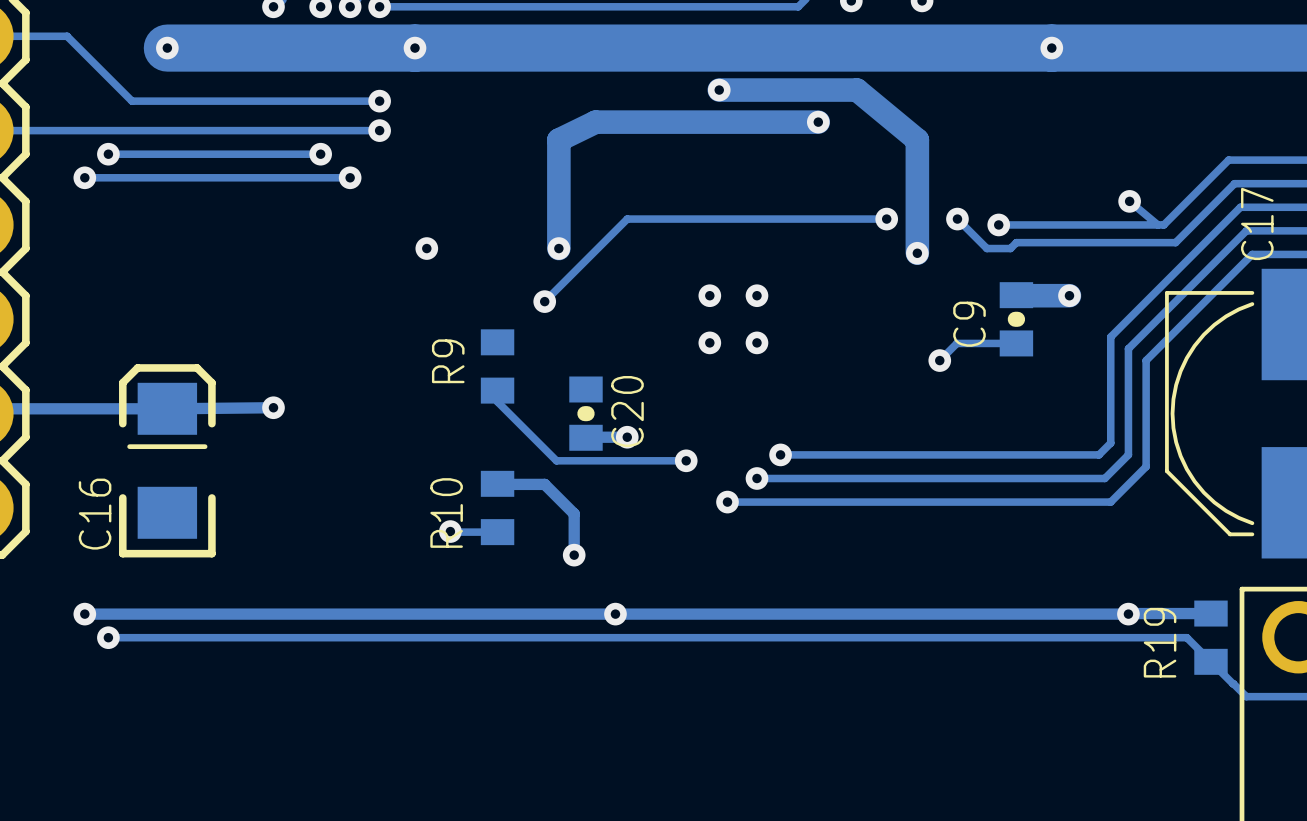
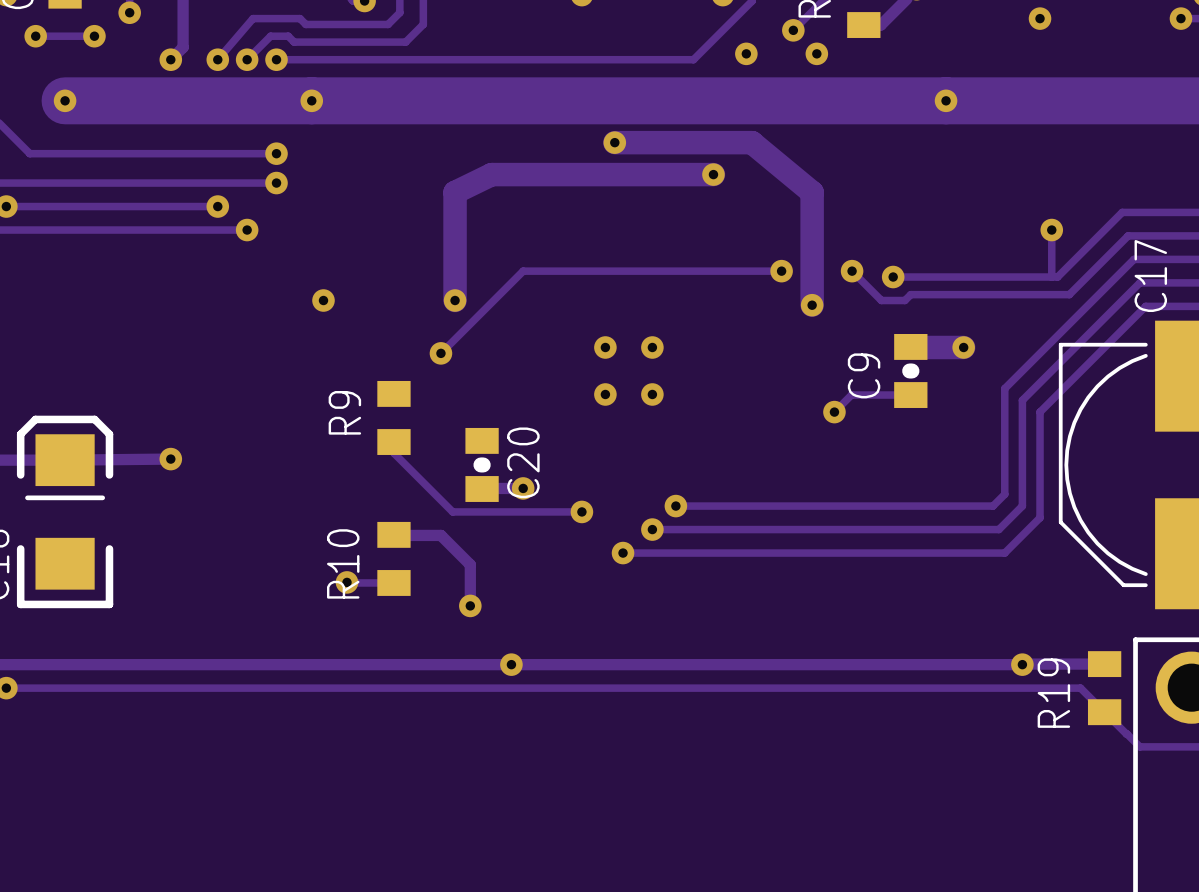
track: (1129, 201) (1157, 224) -> (1051, 230) (1051, 277)
via position: (1129, 201) -> (1051, 230)

